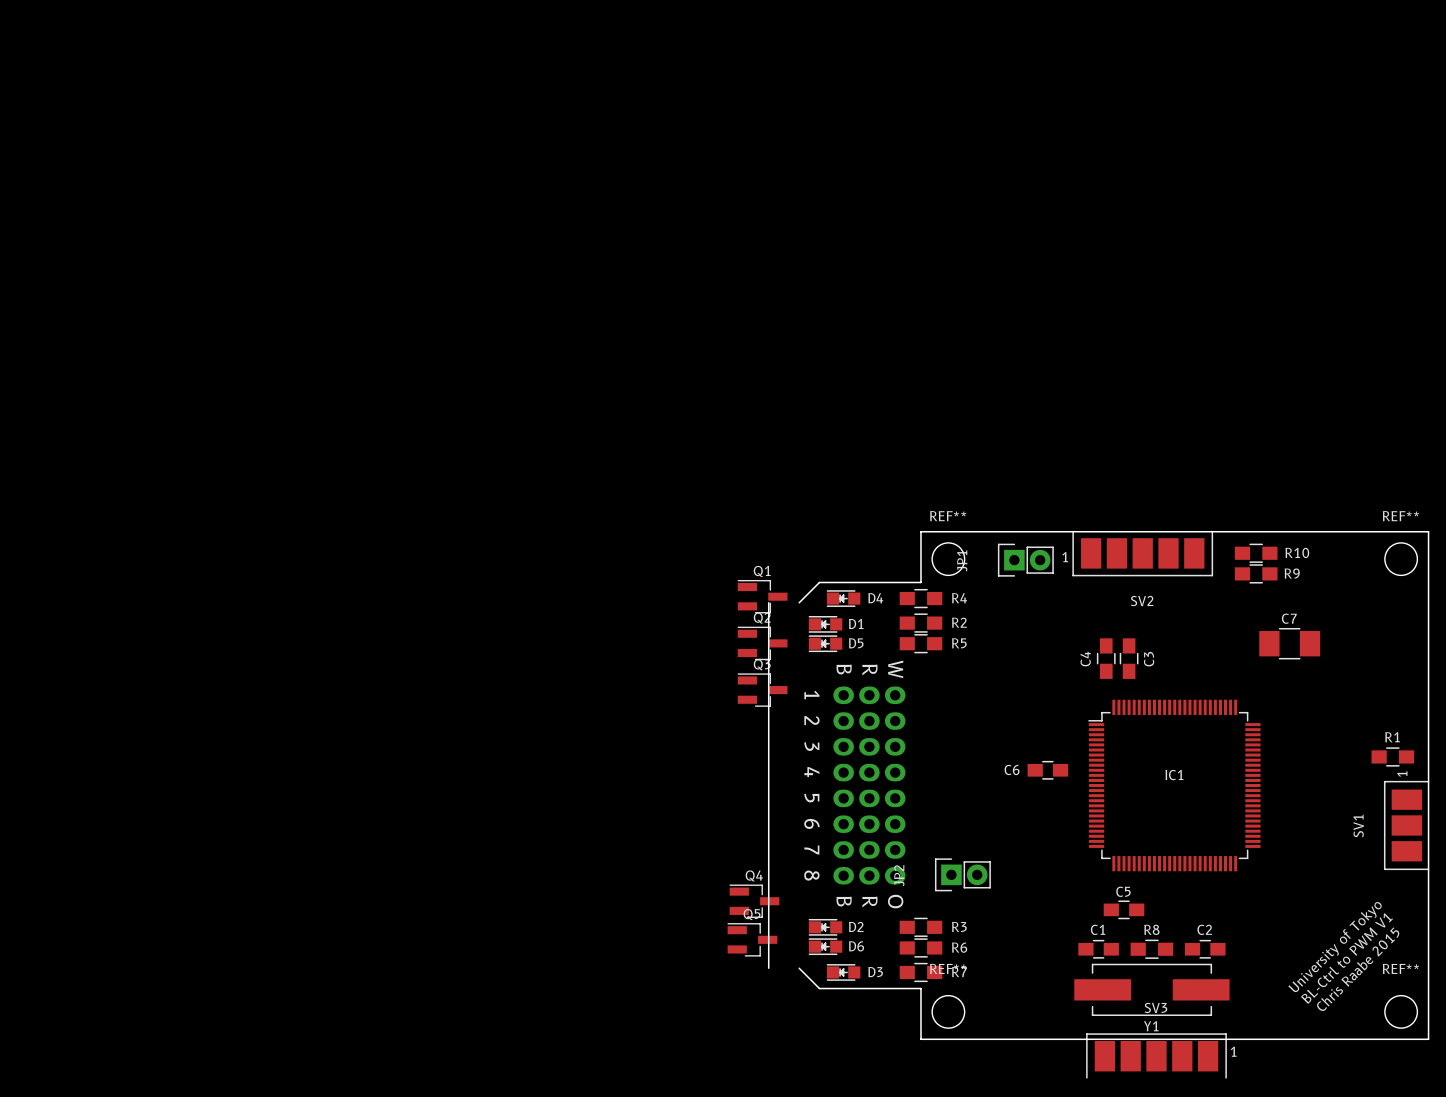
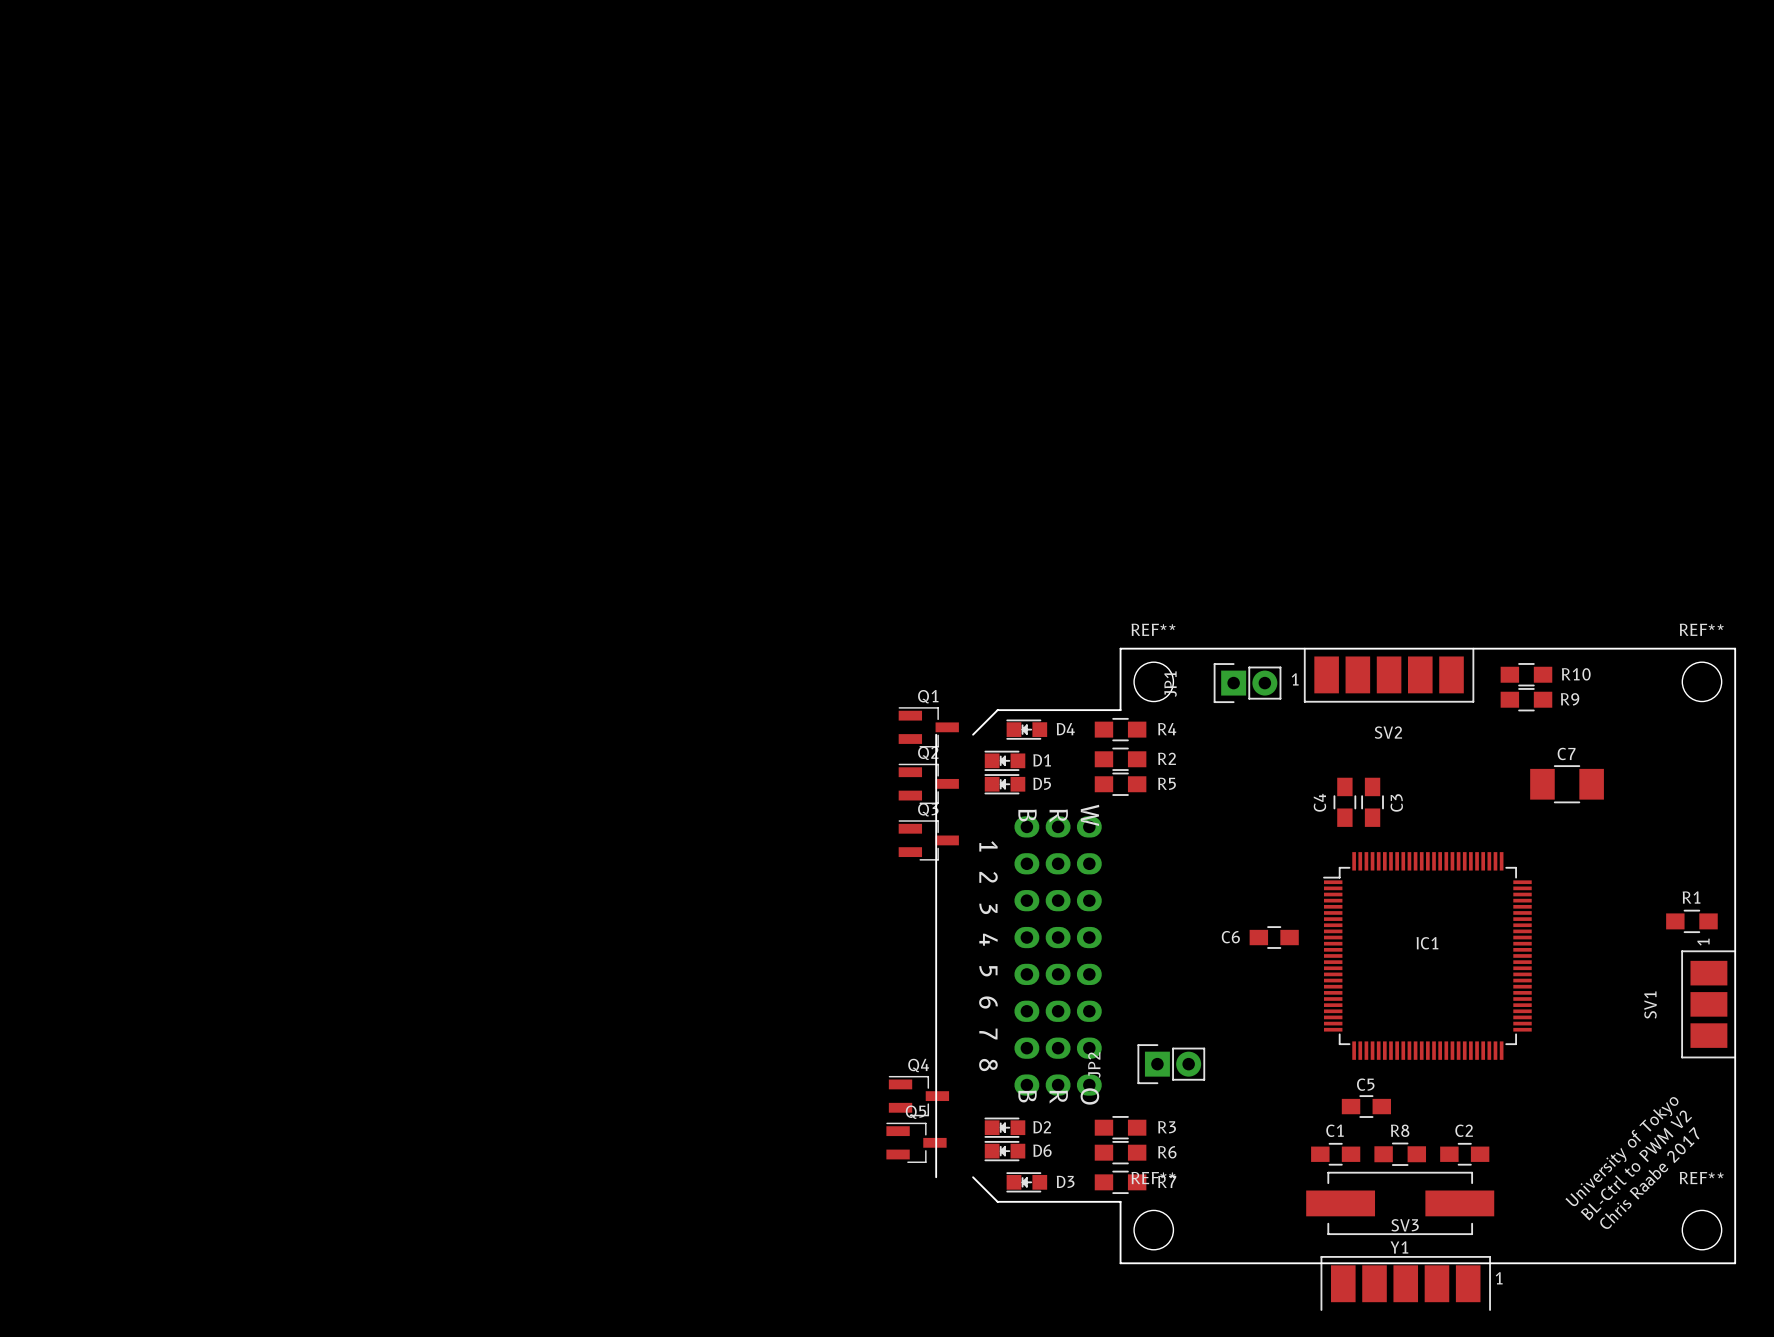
part footprint: [833, 686, 854, 885] -> [1014, 816, 1040, 1096]
part footprint: [859, 686, 880, 885] -> [1045, 816, 1071, 1096]
part footprint: [884, 686, 906, 885] -> [1076, 816, 1102, 1096]
text: BL-Ctrl to PWM V1 (1346, 958) -> BL-Ctrl to PWM V2 (1636, 1165)
text: Chris Raabe 2015 (1358, 969) -> Chris Raabe 2017 (1649, 1177)

